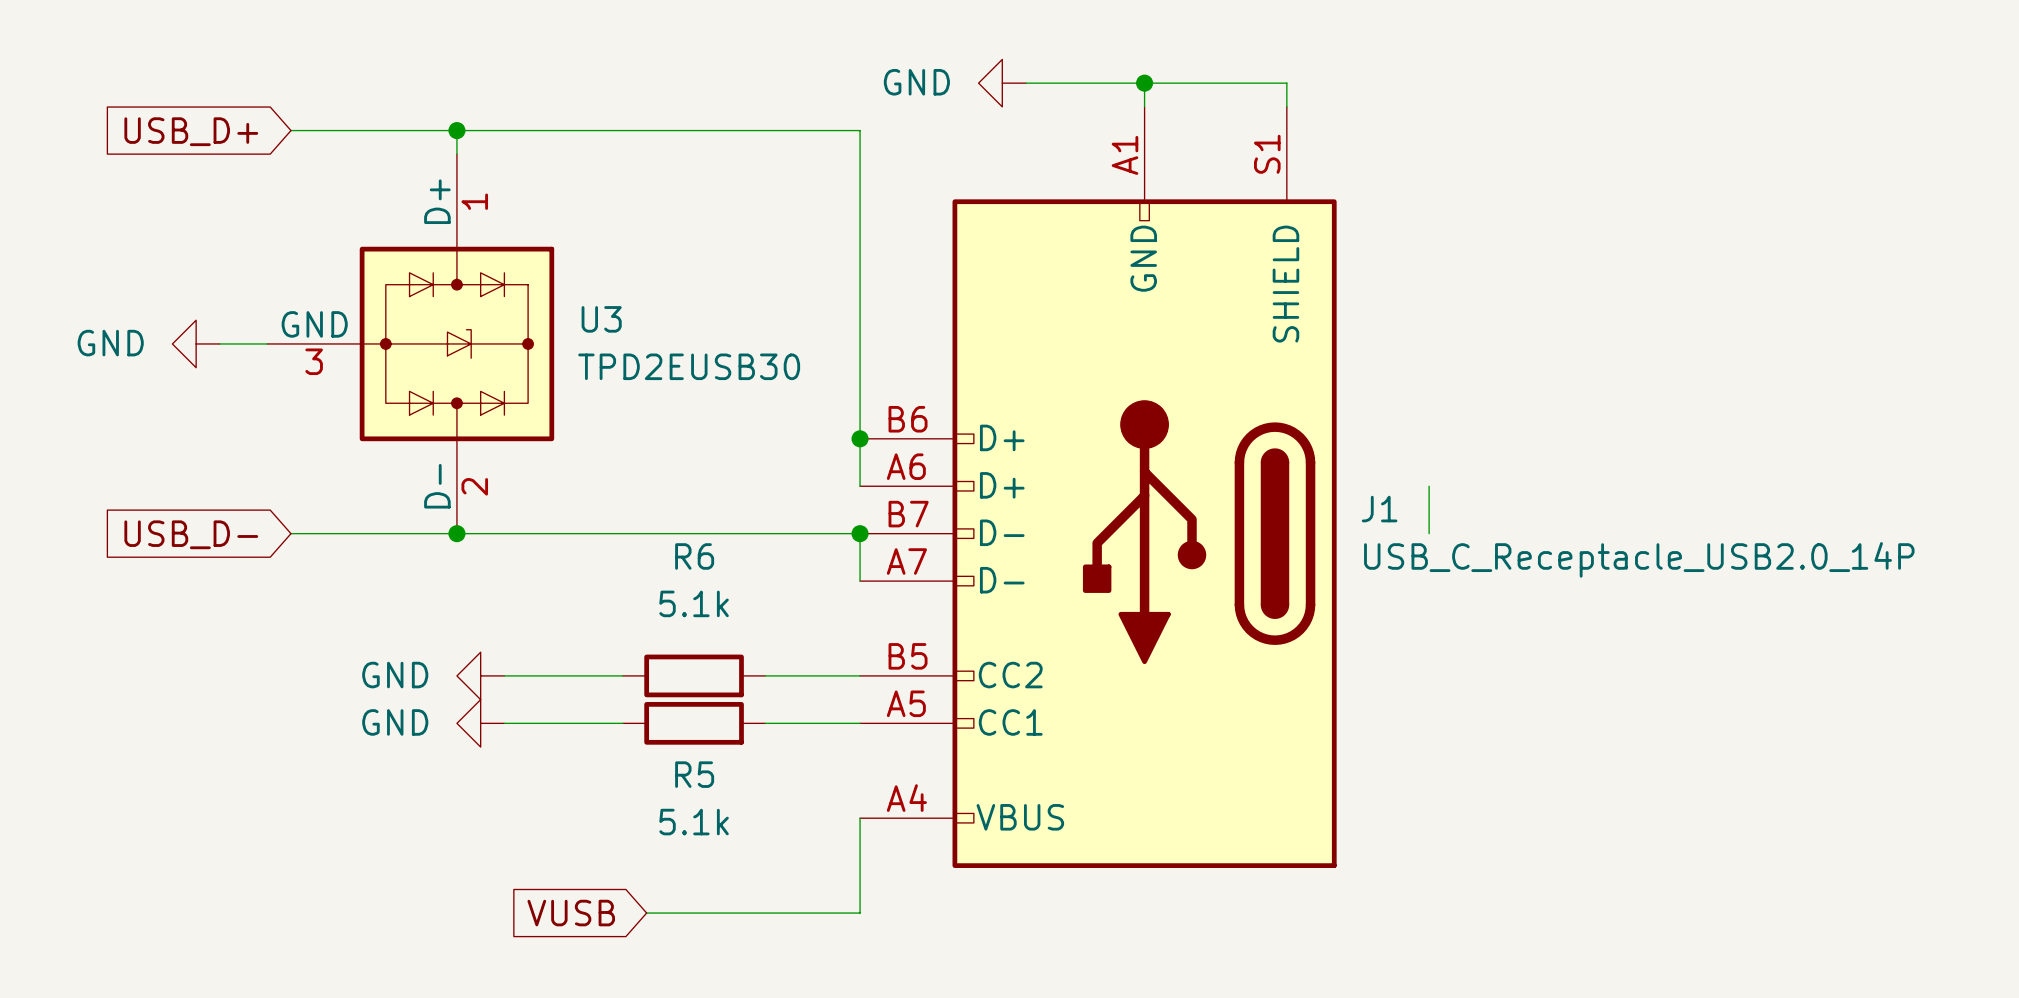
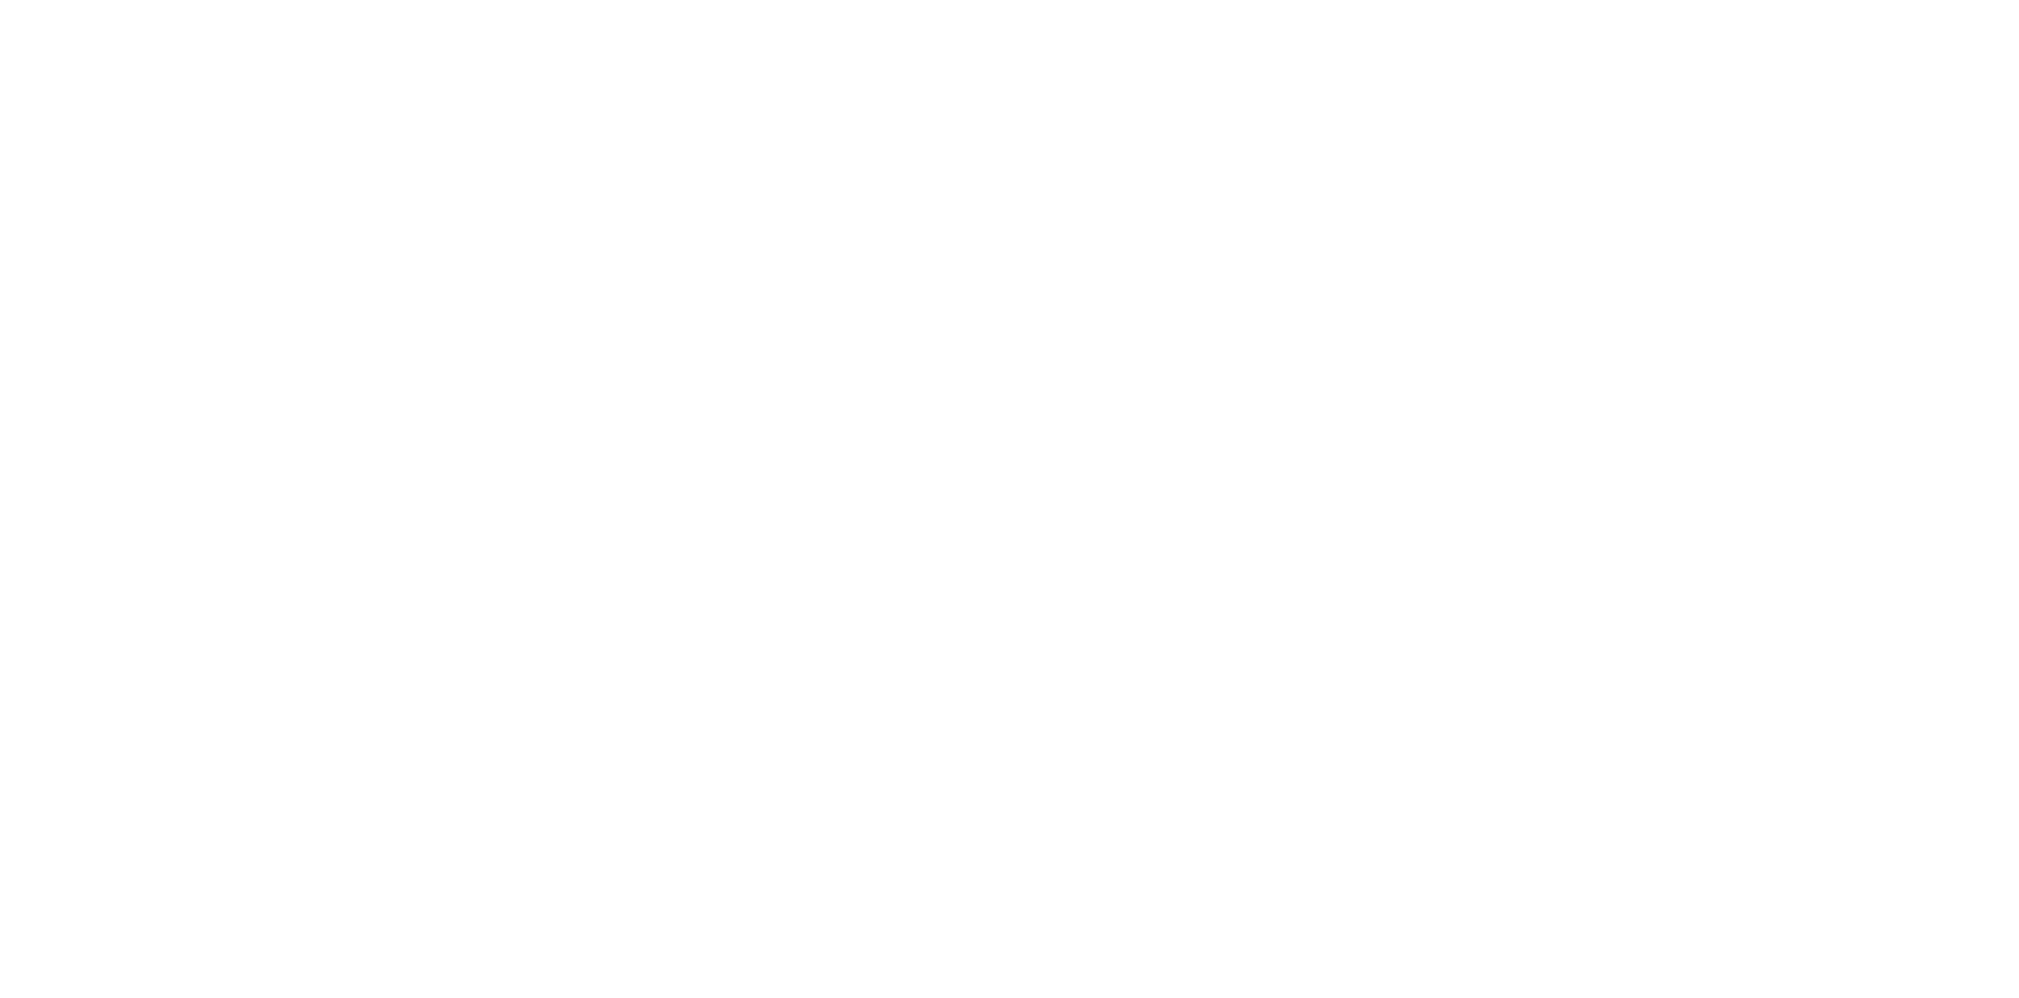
power symbol: GND (1002, 83) -> none
wire: (1026, 83) (1286, 83) (1286, 106) -> none
wire: (1144, 83) (1144, 106) -> none
junction: (1144, 83) -> none
wire: (290, 130) (860, 130) (860, 486) -> none
wire: (456, 130) (456, 154) -> none
junction: (456, 130) -> none
global label: USB_D+ (191, 131) -> none
power symbol: GND (196, 343) -> none
wire: (219, 343) (267, 343) -> none
U3: TPD2EUSB30 (410, 343) -> none
junction: (860, 438) -> none
wire: (1429, 486) (1429, 533) -> none
J1: USB_C_Receptacle_USB2.0_14P (1098, 487) -> none
wire: (290, 533) (860, 533) (860, 581) -> none
junction: (456, 533) -> none
junction: (860, 533) -> none
global label: USB_D- (191, 534) -> none
power symbol: GND (480, 675) -> none
wire: (504, 675) (622, 675) -> none
R6: 5.1k (694, 675) -> none
wire: (765, 675) (860, 675) -> none
power symbol: GND (480, 723) -> none
wire: (504, 723) (622, 723) -> none
R5: 5.1k (694, 723) -> none
wire: (765, 723) (860, 723) -> none
wire: (860, 818) (860, 913) (646, 913) -> none
global label: VUSB (571, 913) -> none

